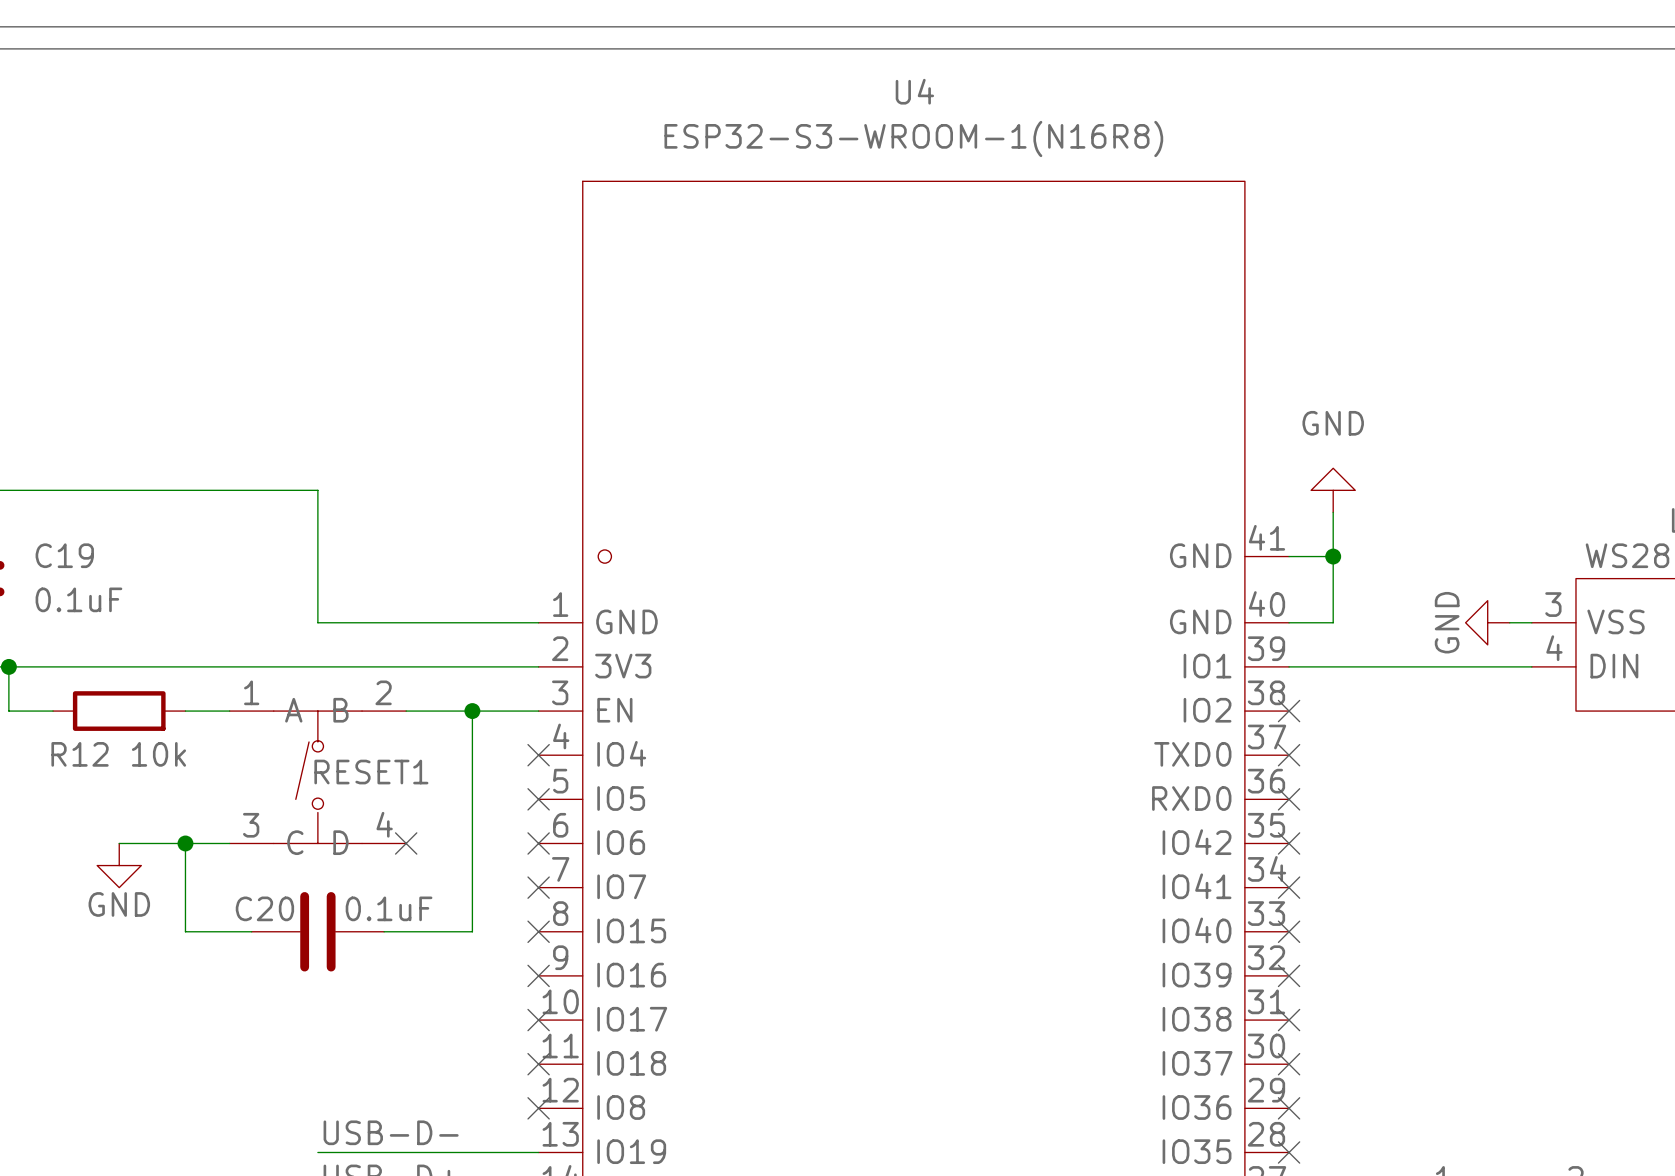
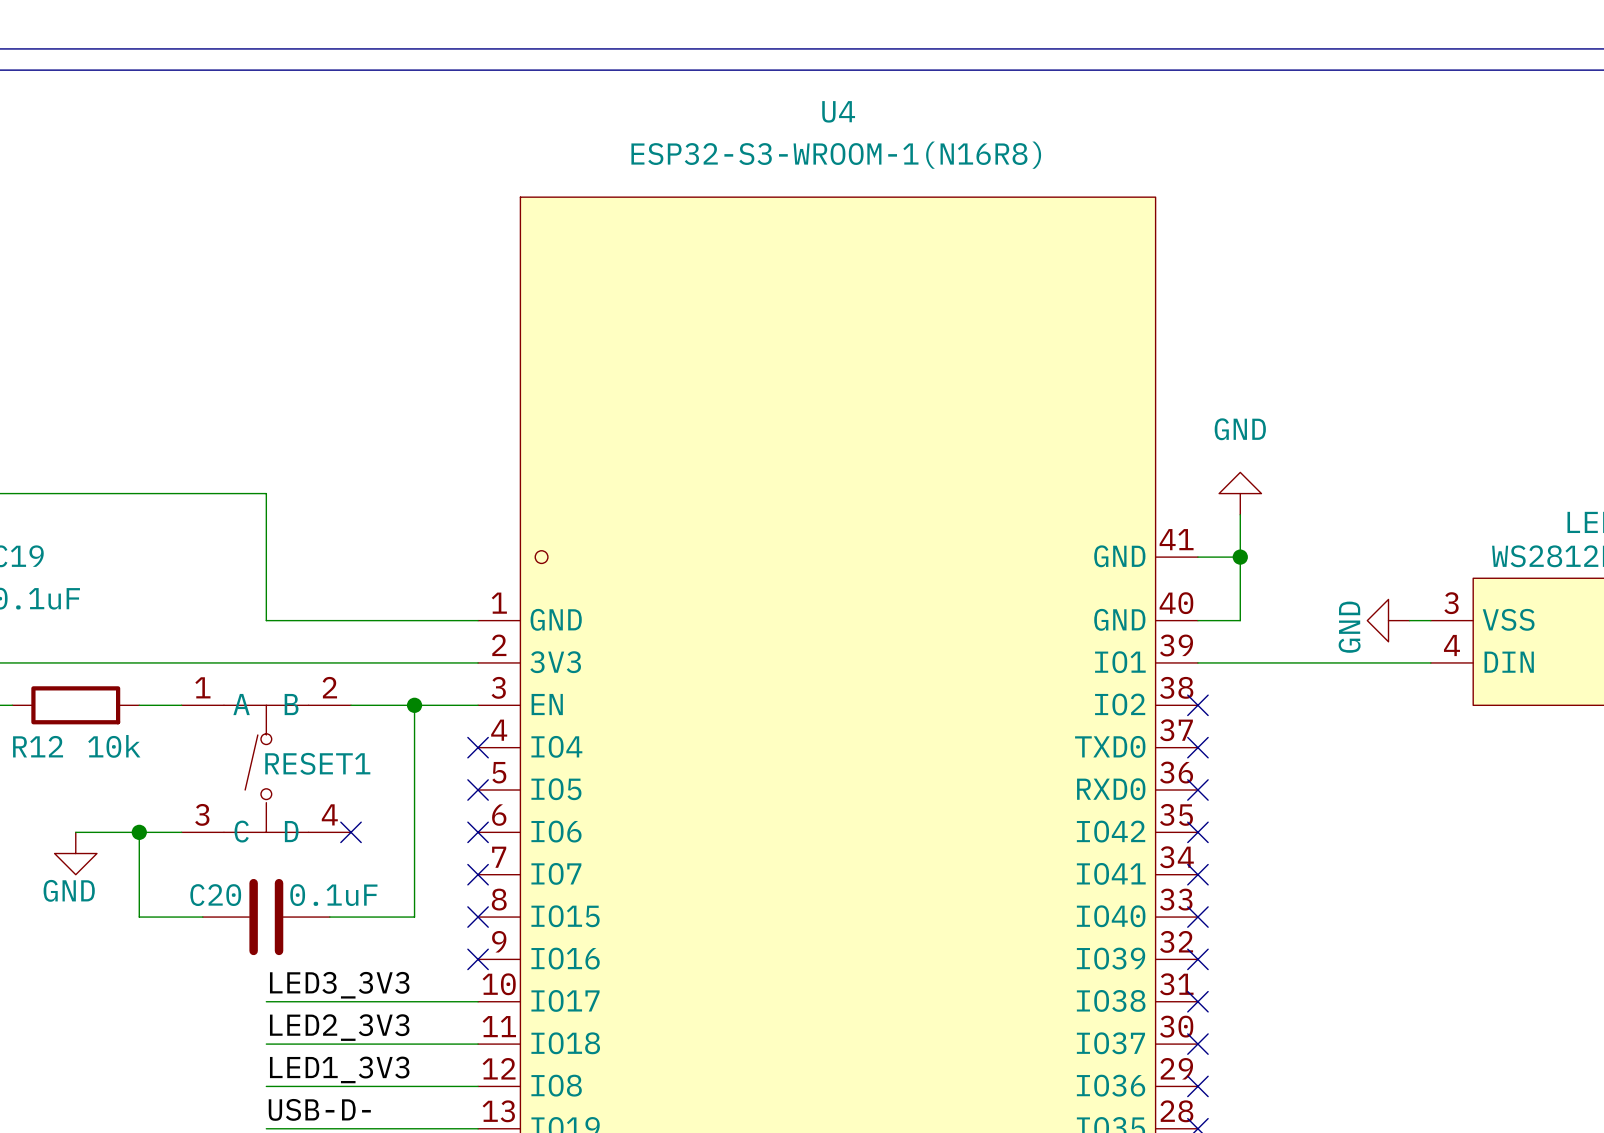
label: none -> LED3_3V3 (339, 985)
wire: none -> (266, 1001) (478, 1001)
no-connect mark: (538, 1020) -> none
label: none -> LED2_3V3 (339, 1027)
wire: none -> (266, 1044) (478, 1044)
no-connect mark: (538, 1064) -> none
label: none -> LED1_3V3 (339, 1069)
wire: none -> (266, 1086) (478, 1086)
no-connect mark: (538, 1108) -> none

